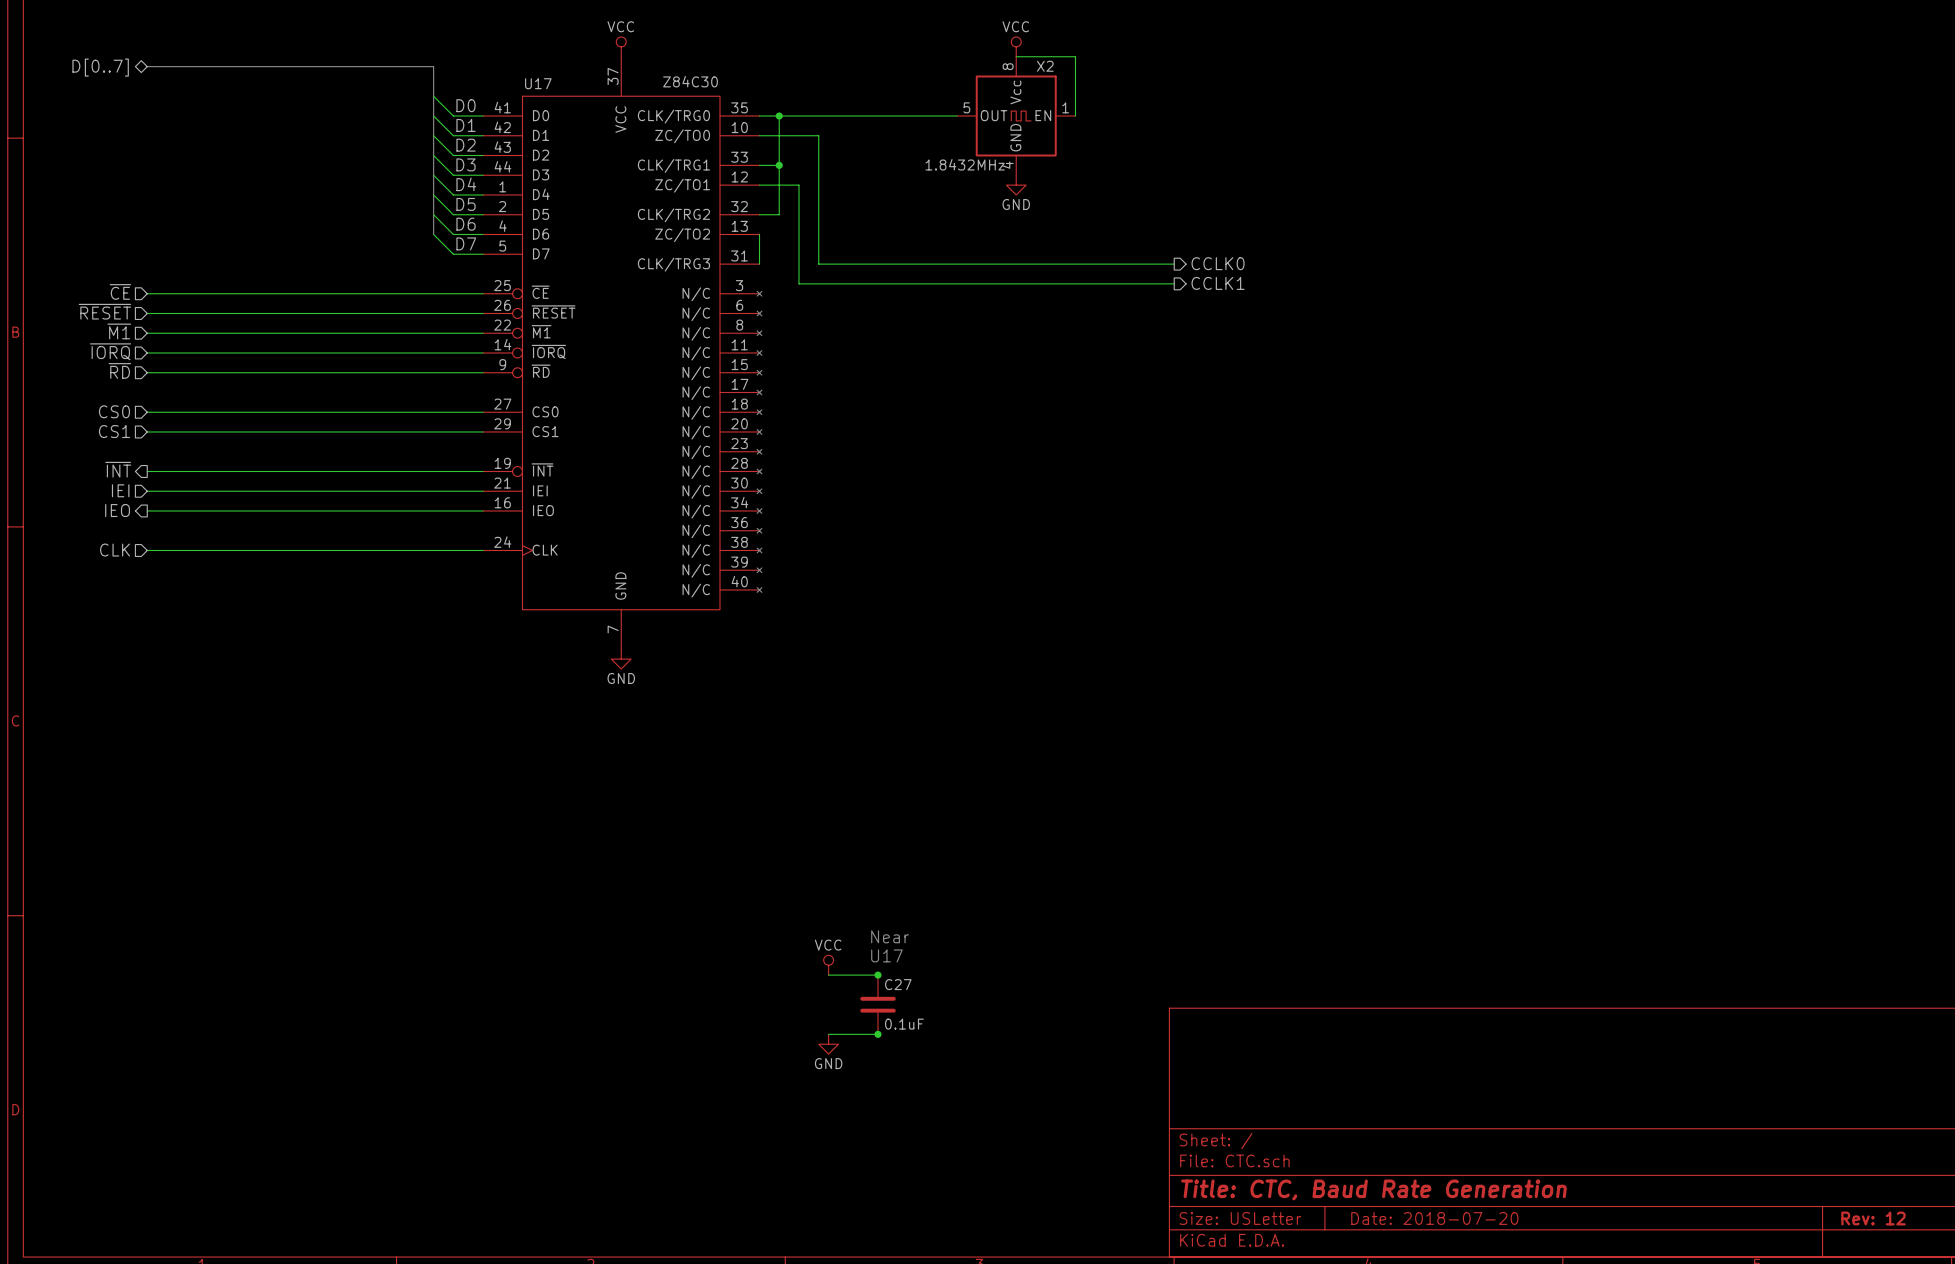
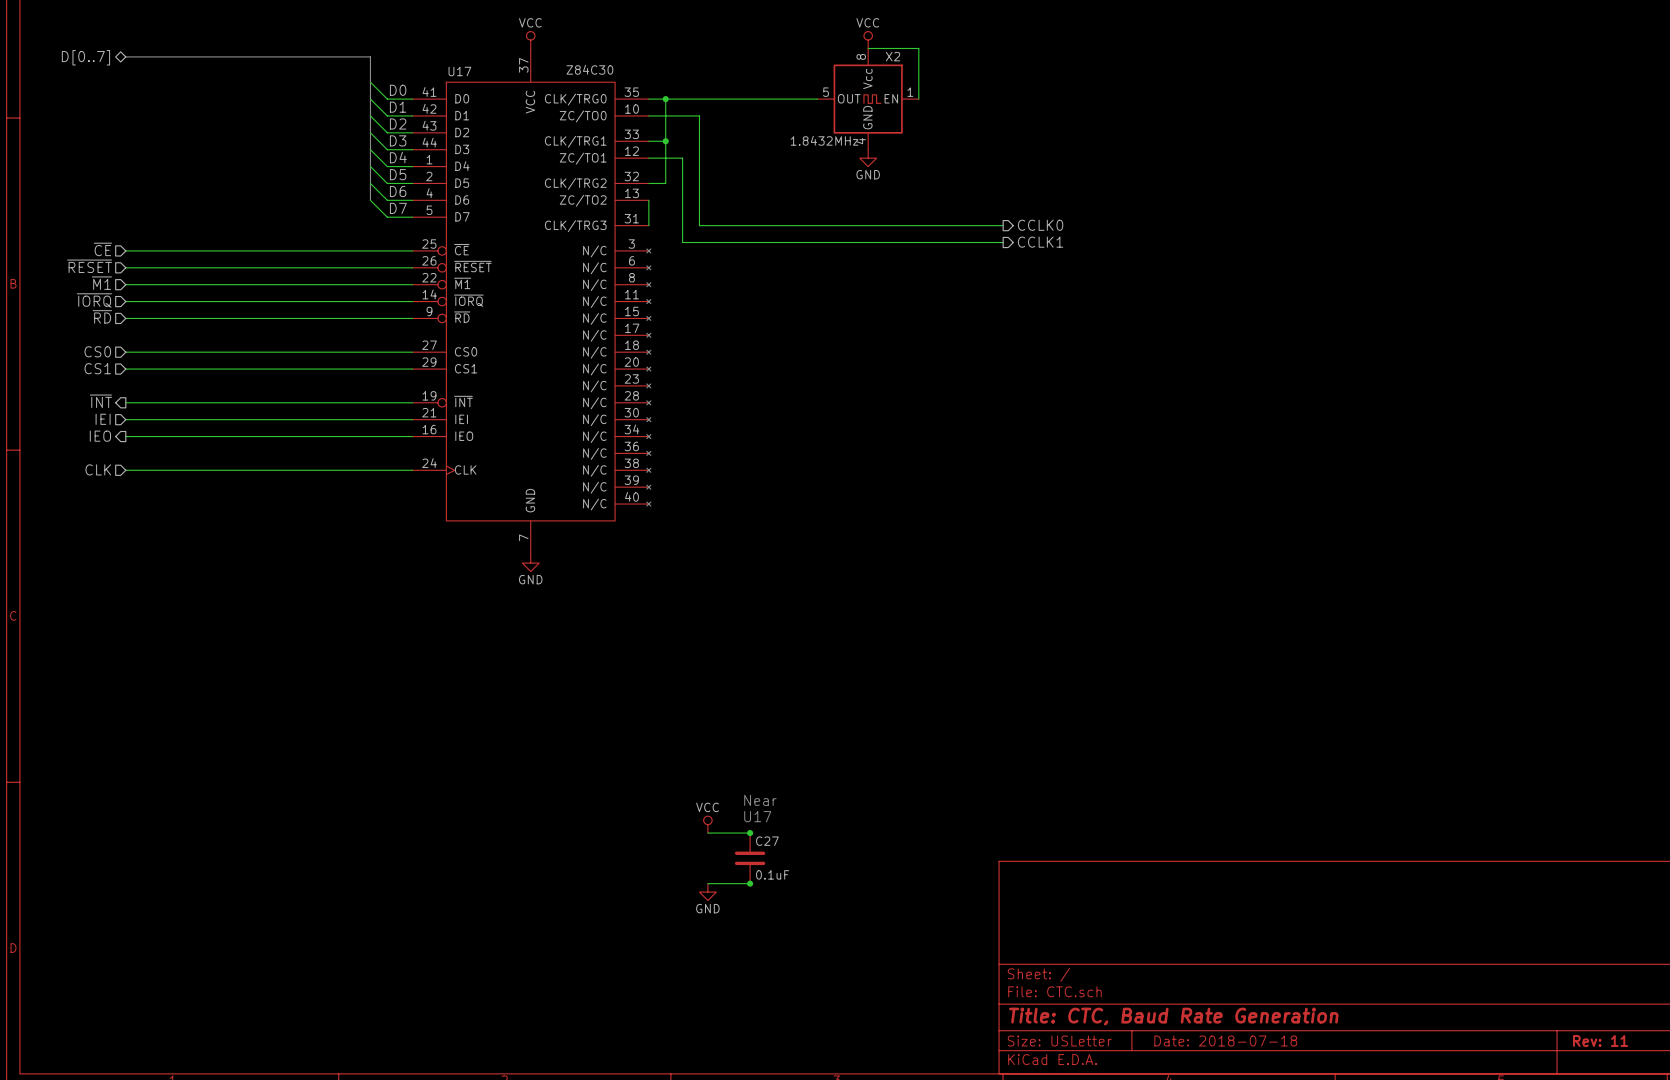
title block: Date: 2018-07-20 (1434, 1218) -> Date: 2018-07-18 (1225, 1040)
title block: Rev: 12 (1873, 1218) -> Rev: 11 (1600, 1040)

